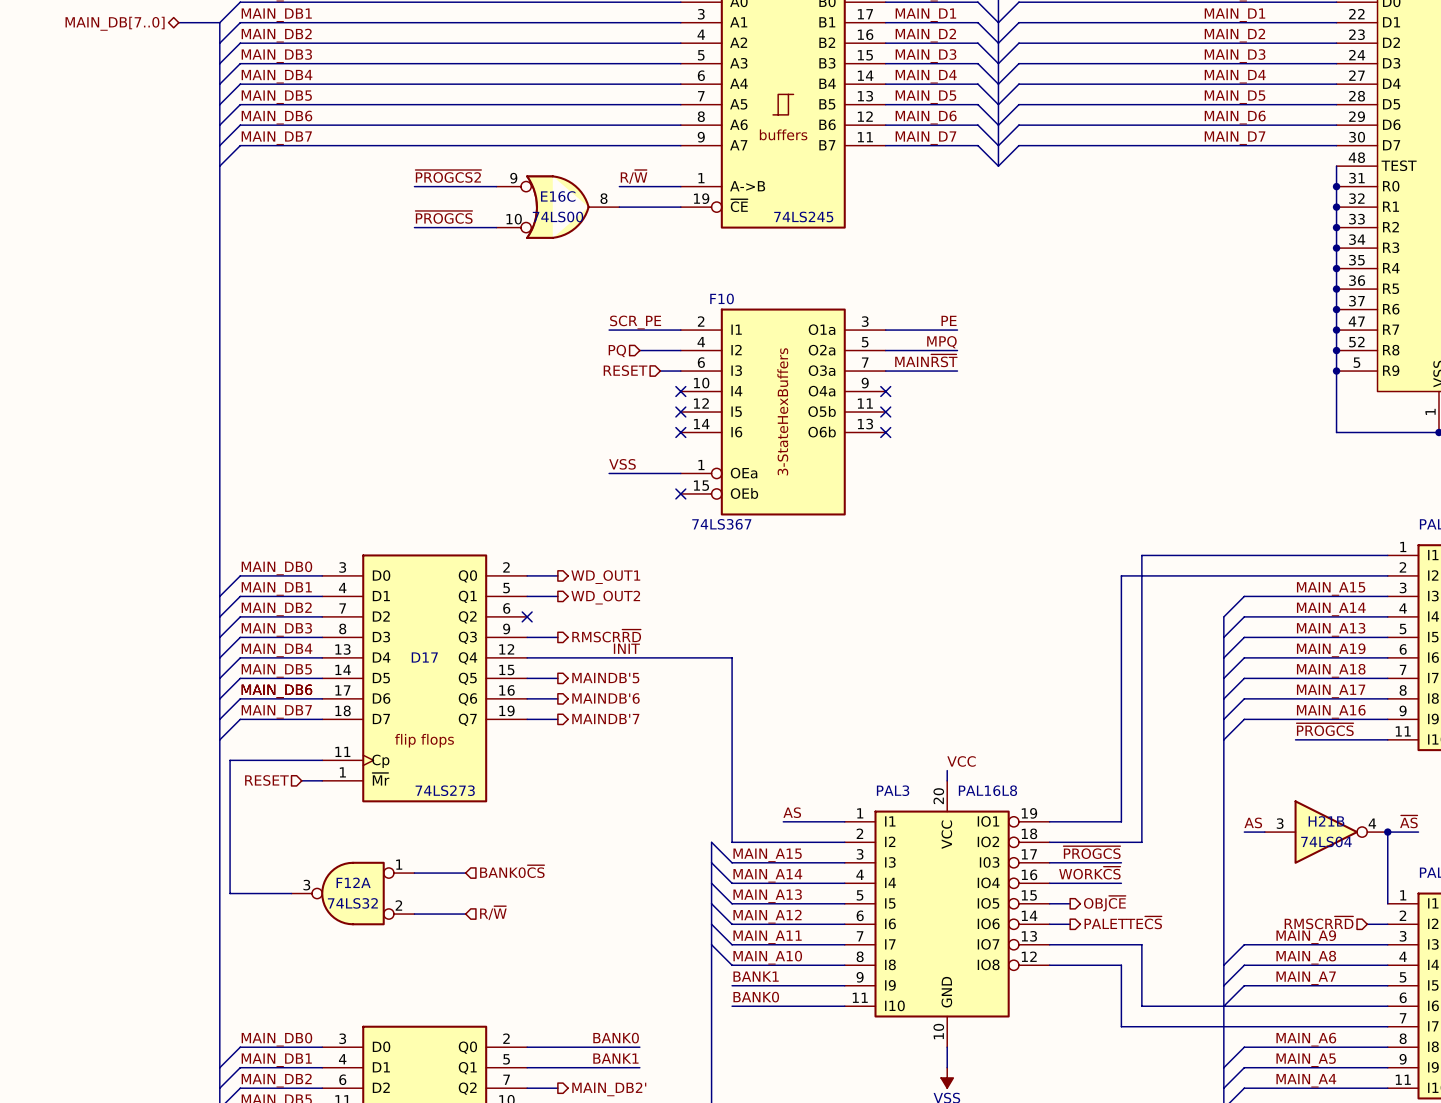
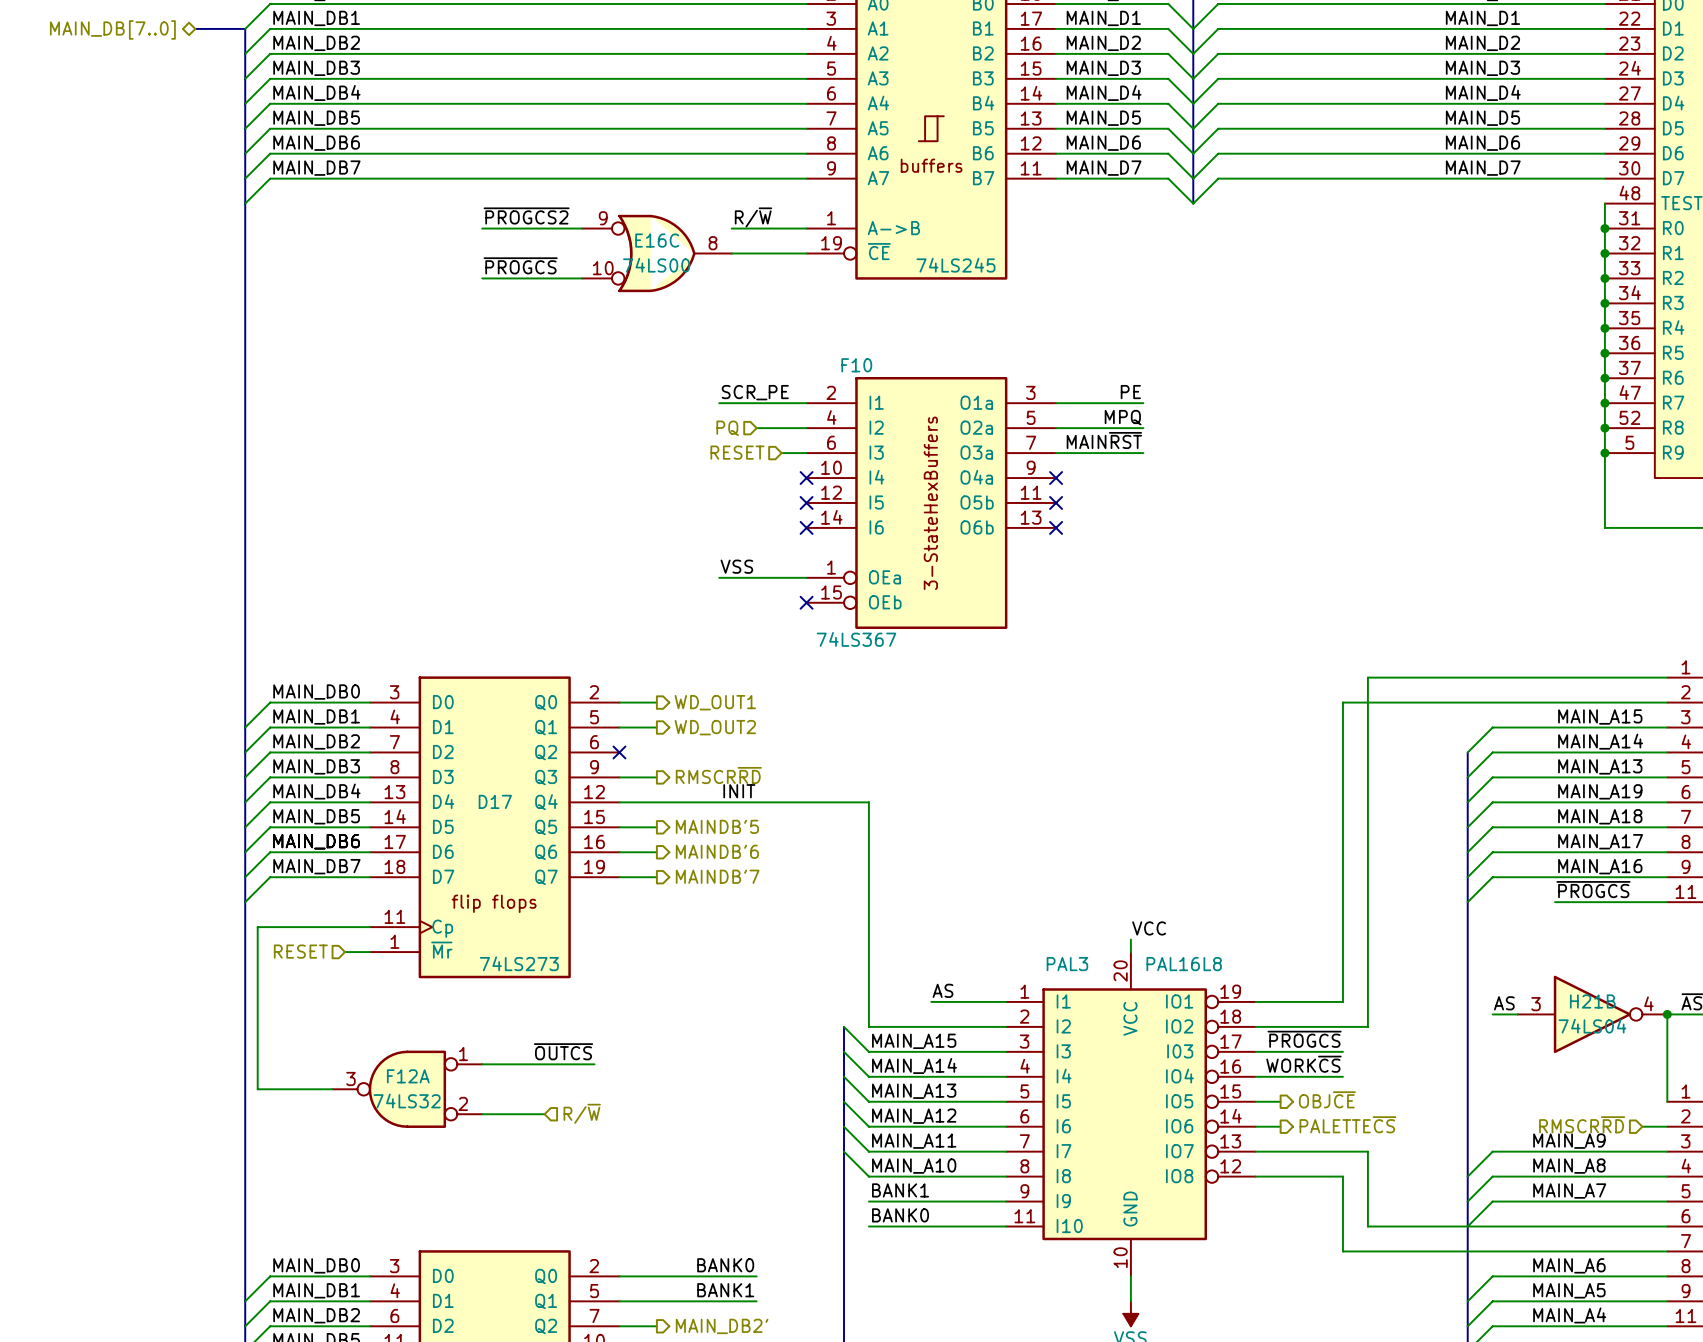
label: none -> ~{OUTCS} (563, 1051)
hierarchical label: BANK0~{CS} (512, 871) -> none
wire: none -> (544, 1064) (594, 1064)

